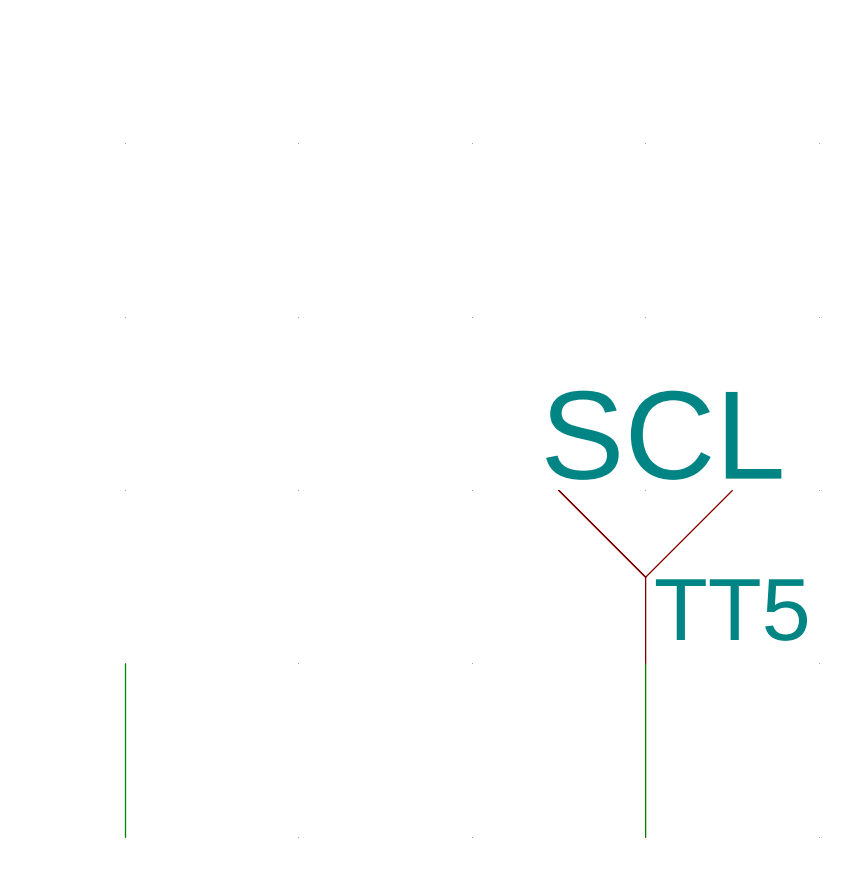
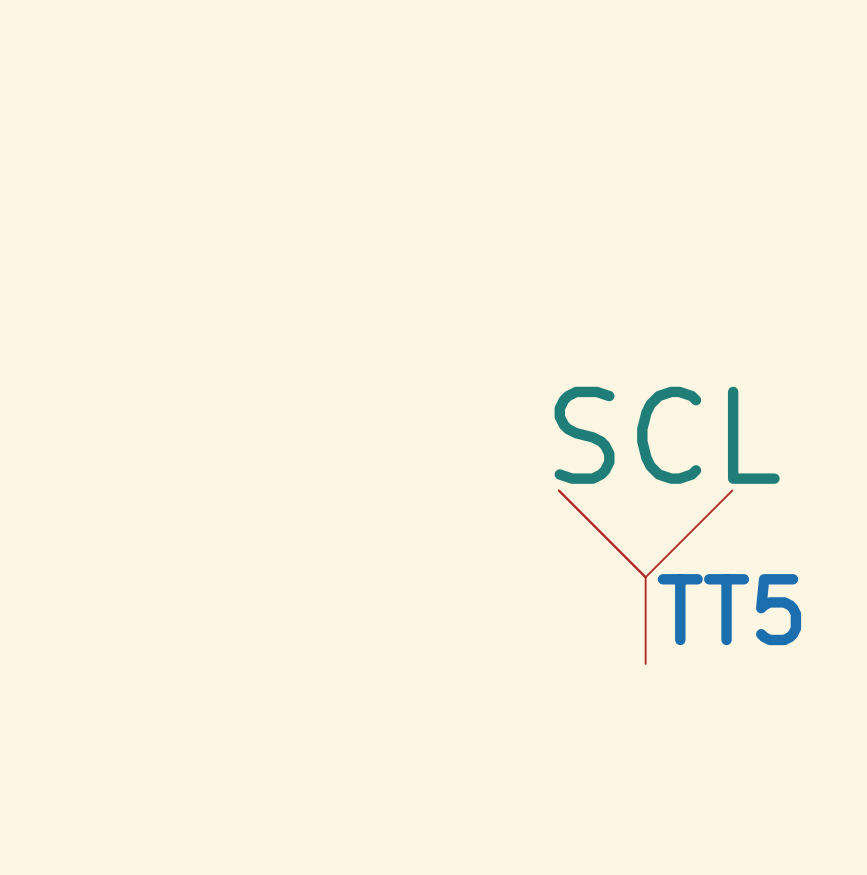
wire: (125, 663) (125, 837) -> none
wire: (645, 663) (645, 837) -> none

